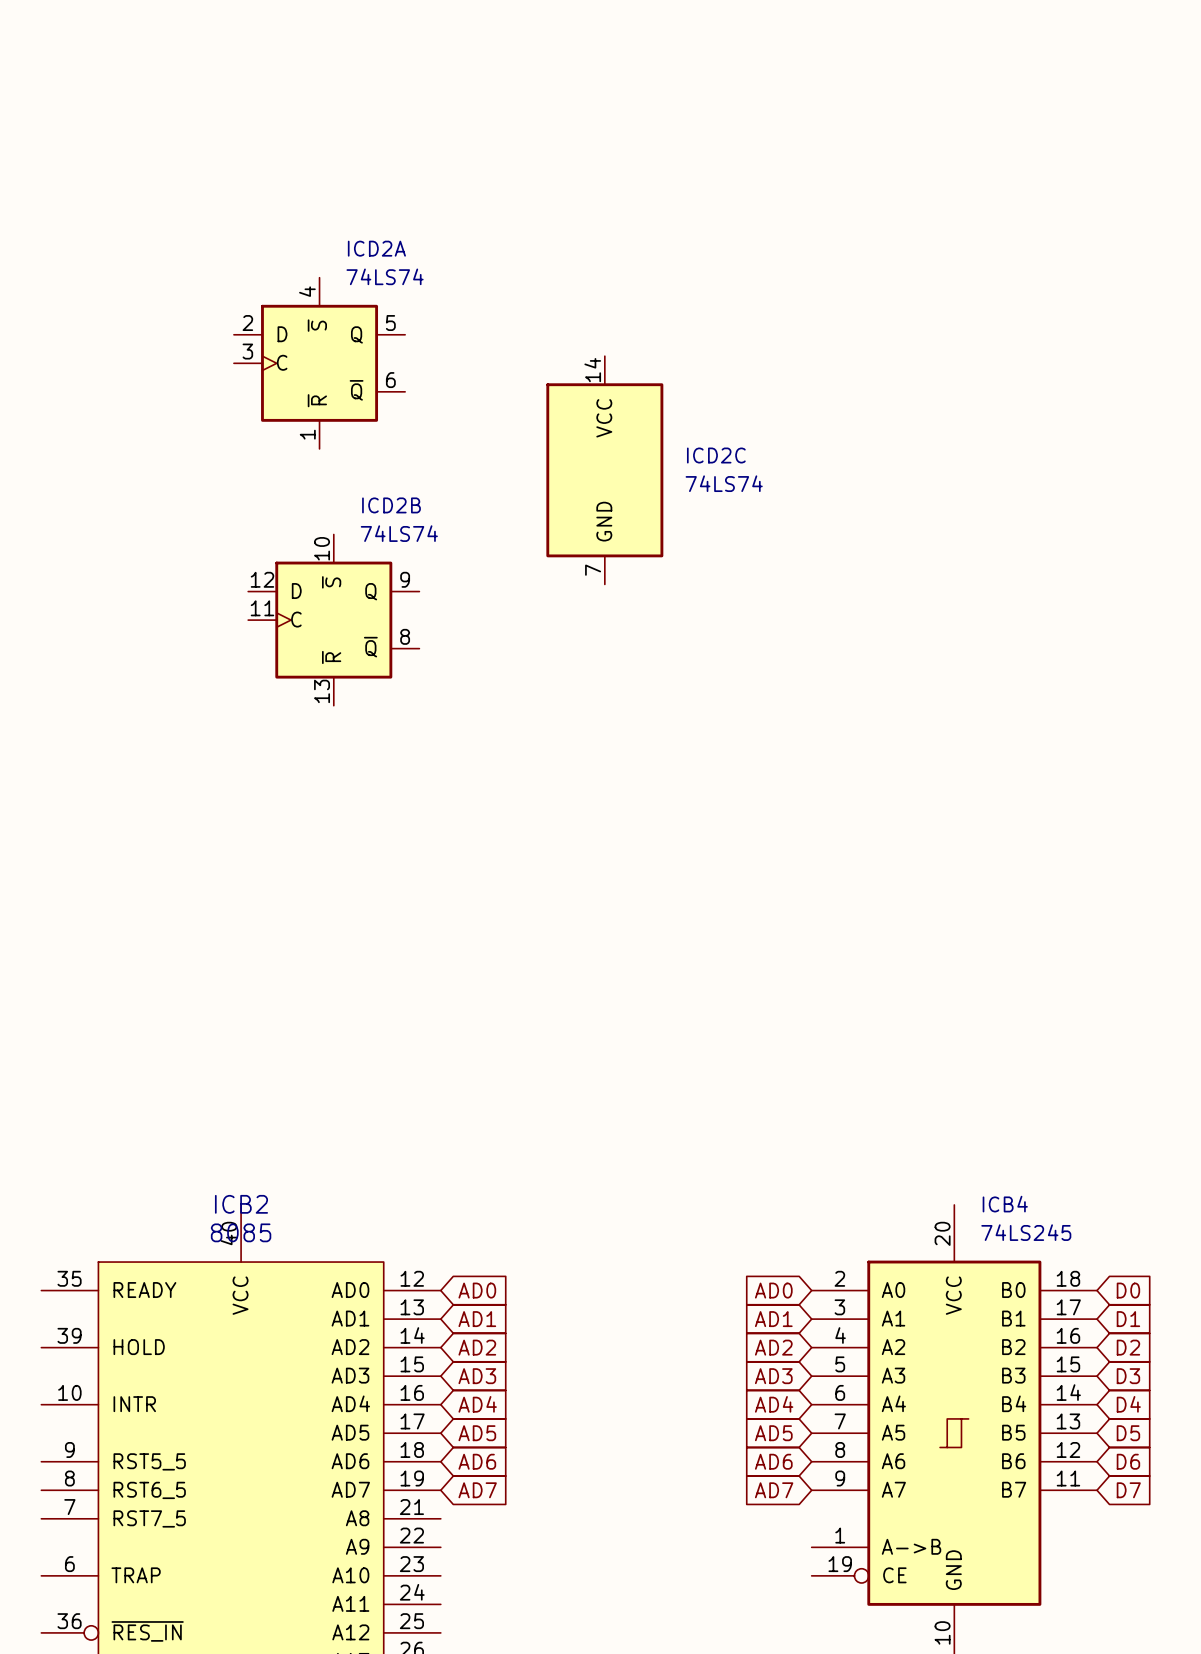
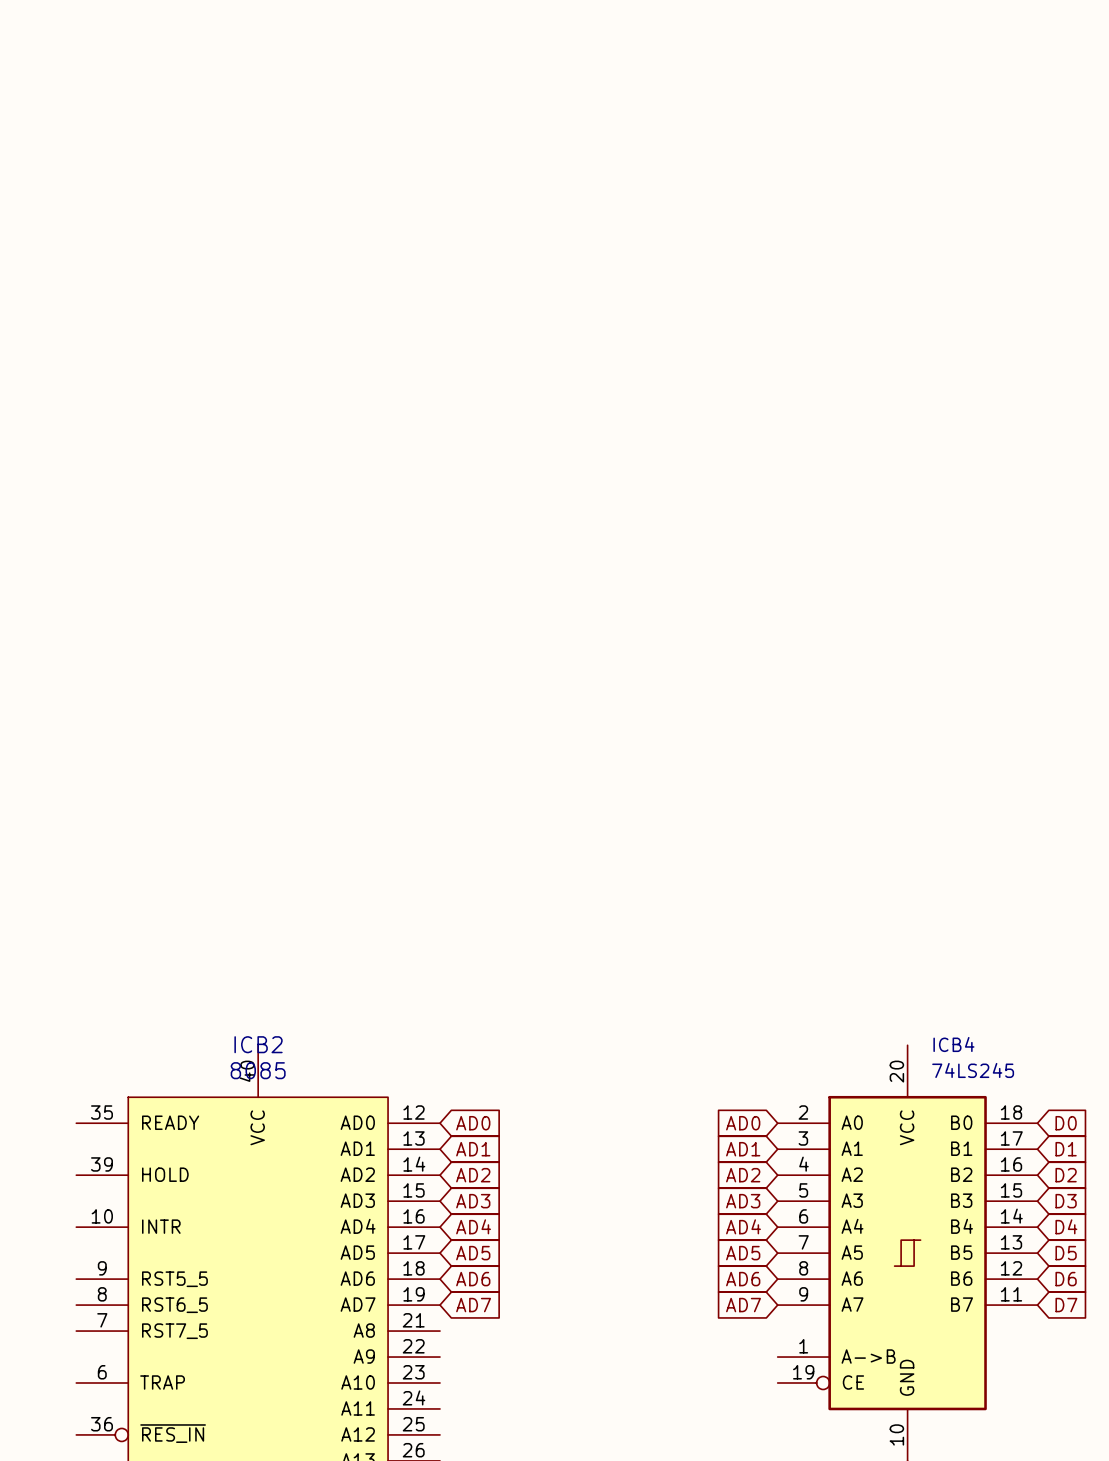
ICD2A: 74LS74 (319, 363) -> none
ICD2C: 74LS74 (604, 470) -> none
ICD2B: 74LS74 (333, 620) -> none

